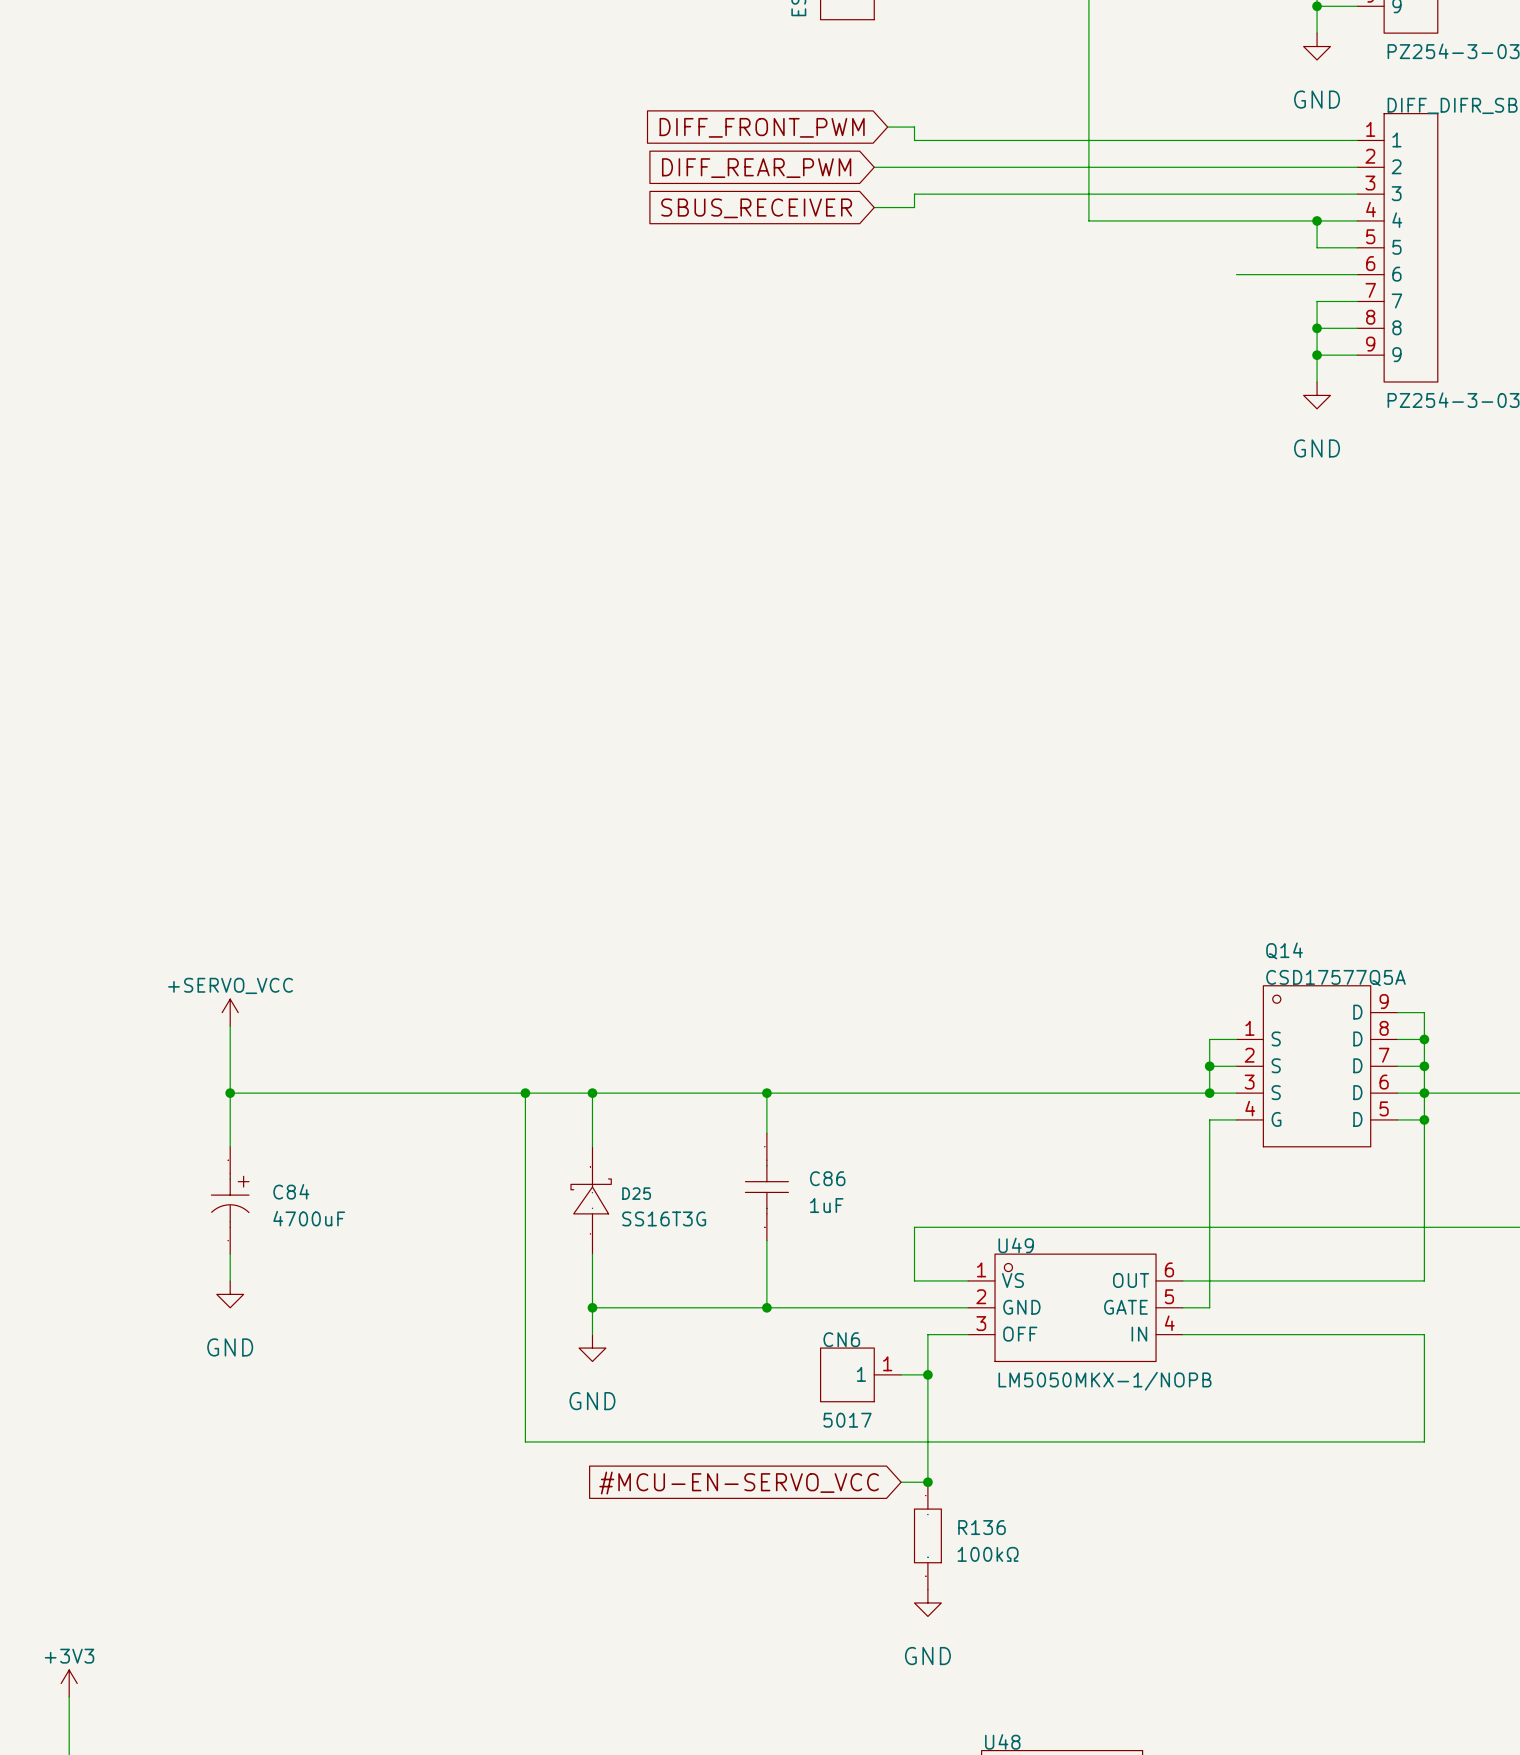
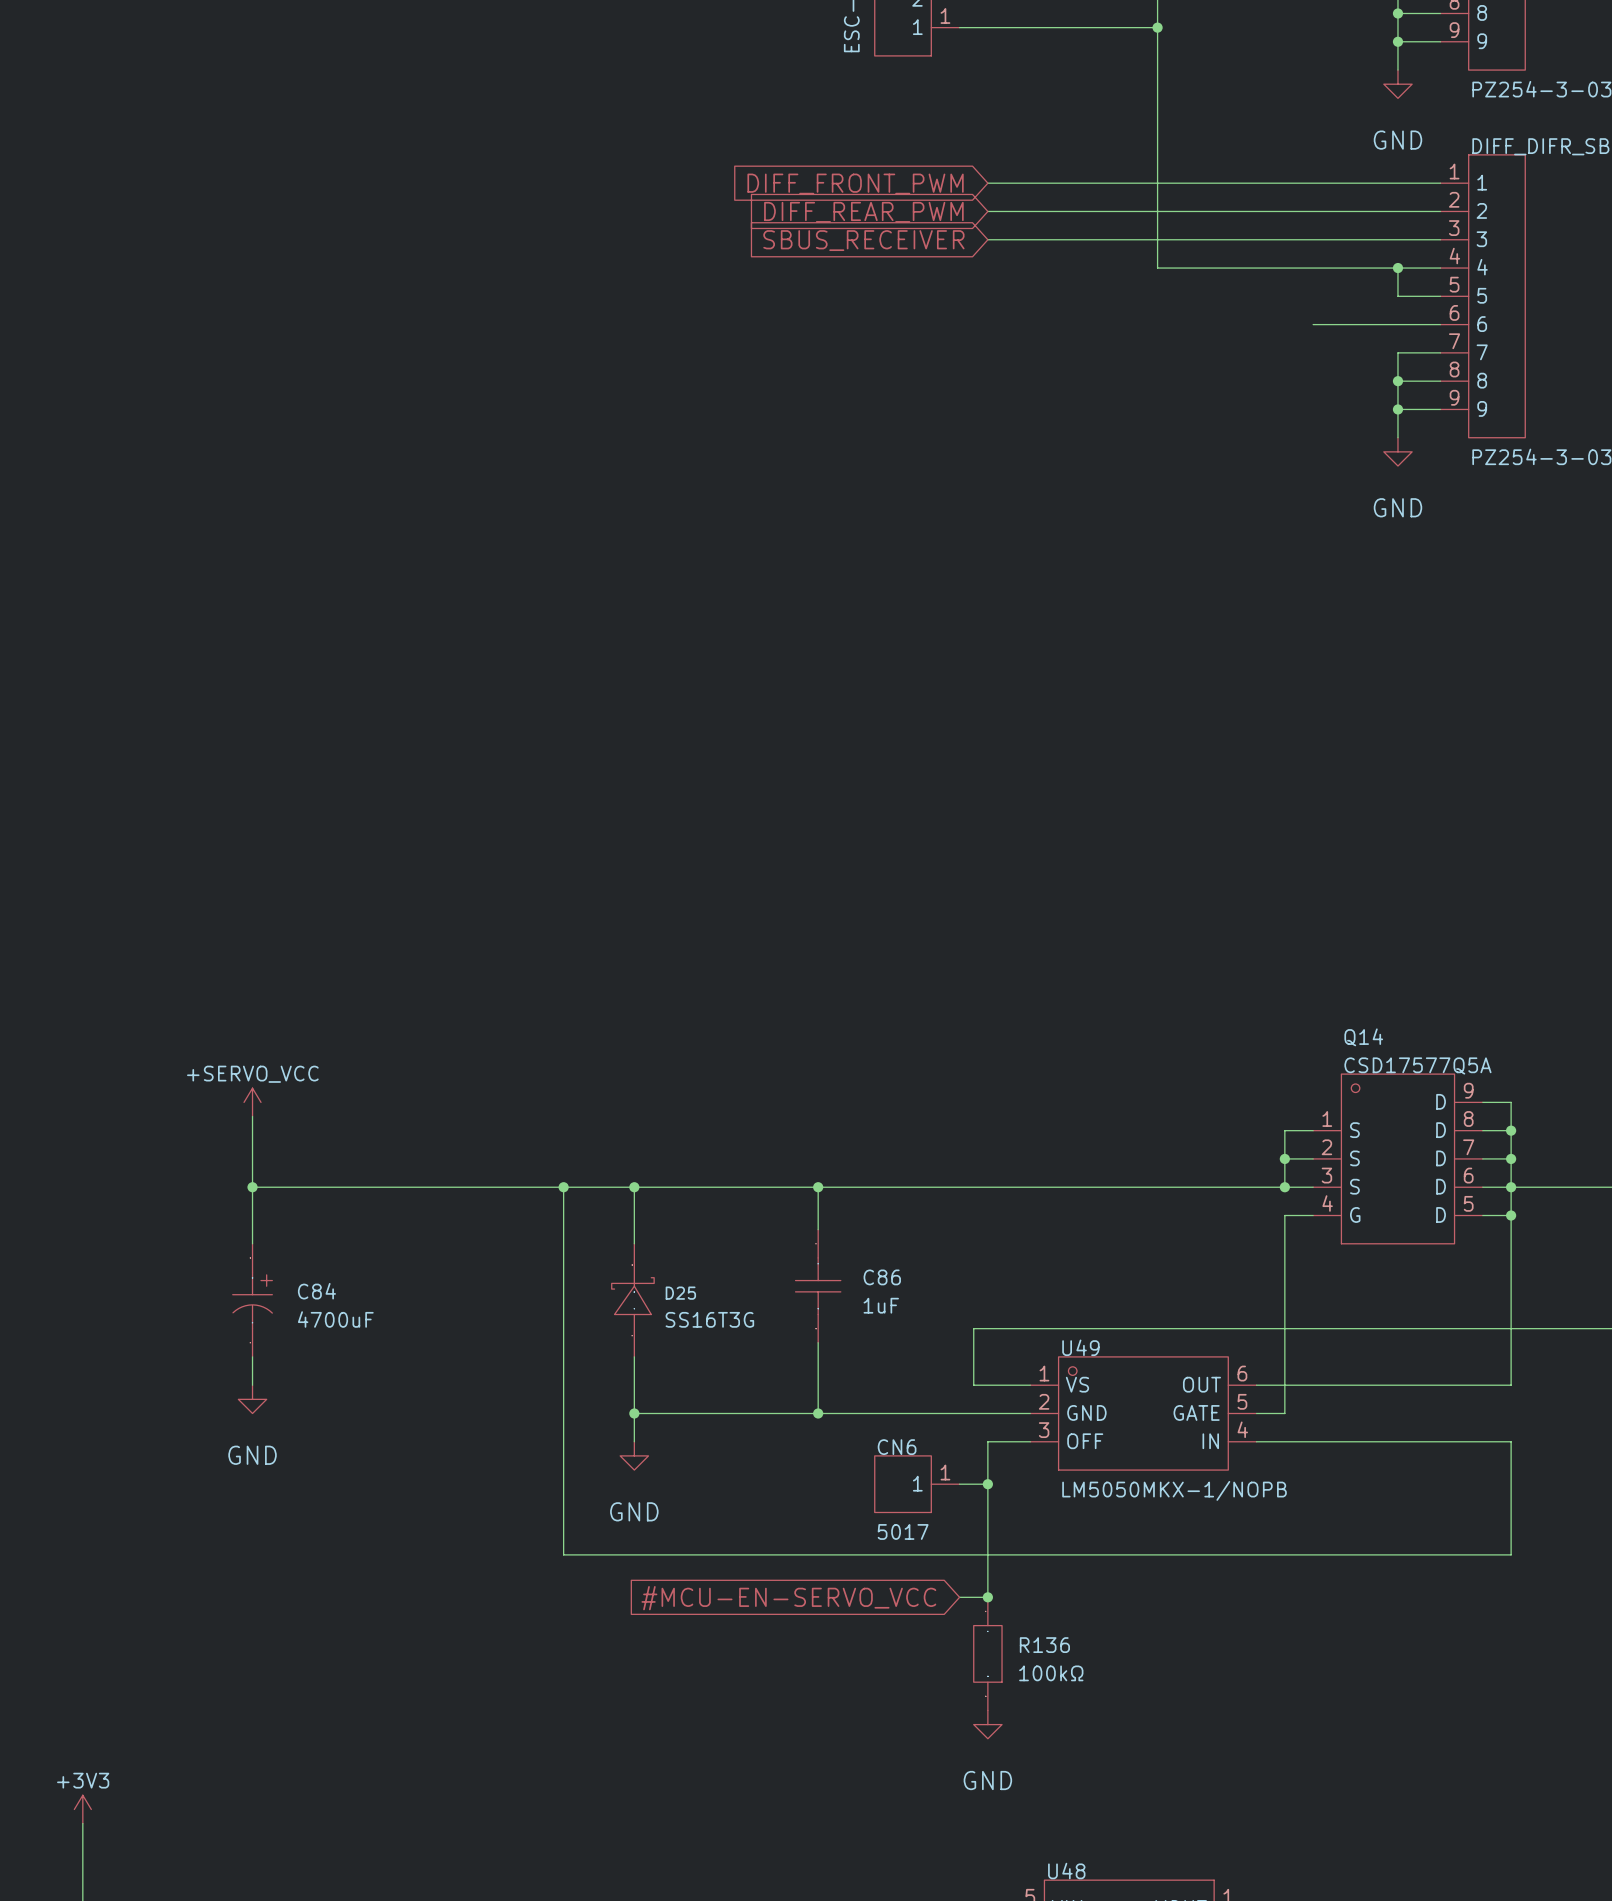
global label position: DIFF_FRONT_PWM (762, 127) -> DIFF_FRONT_PWM (855, 184)
wire: (887, 127) (914, 127) (914, 140) (927, 140) -> none
wire: (874, 167) (927, 167) -> none
global label position: DIFF_REAR_PWM (756, 168) -> DIFF_REAR_PWM (863, 212)
wire: (927, 194) (914, 194) (914, 207) (874, 207) -> none
global label position: SBUS_RECEIVER (756, 208) -> SBUS_RECEIVER (863, 240)

